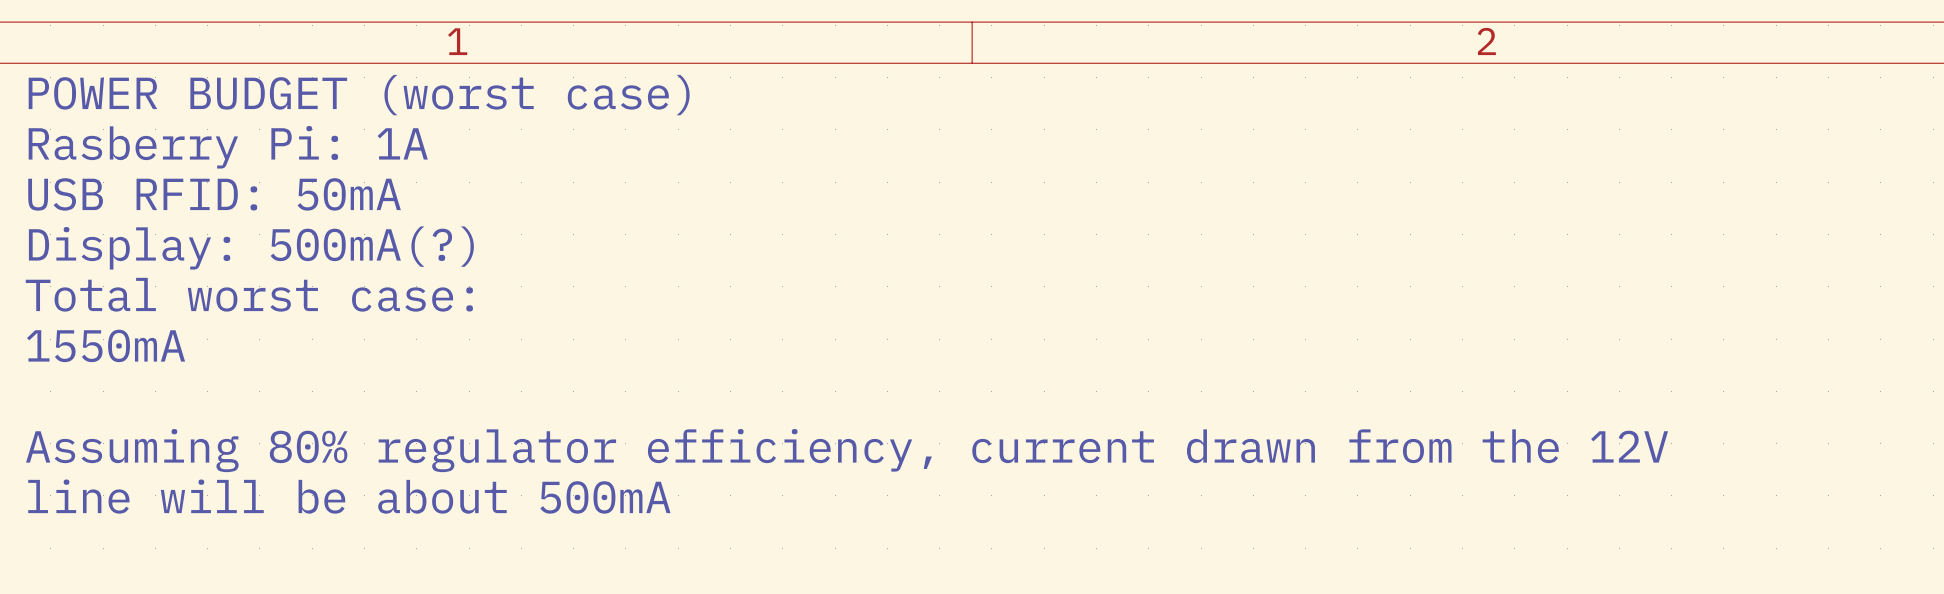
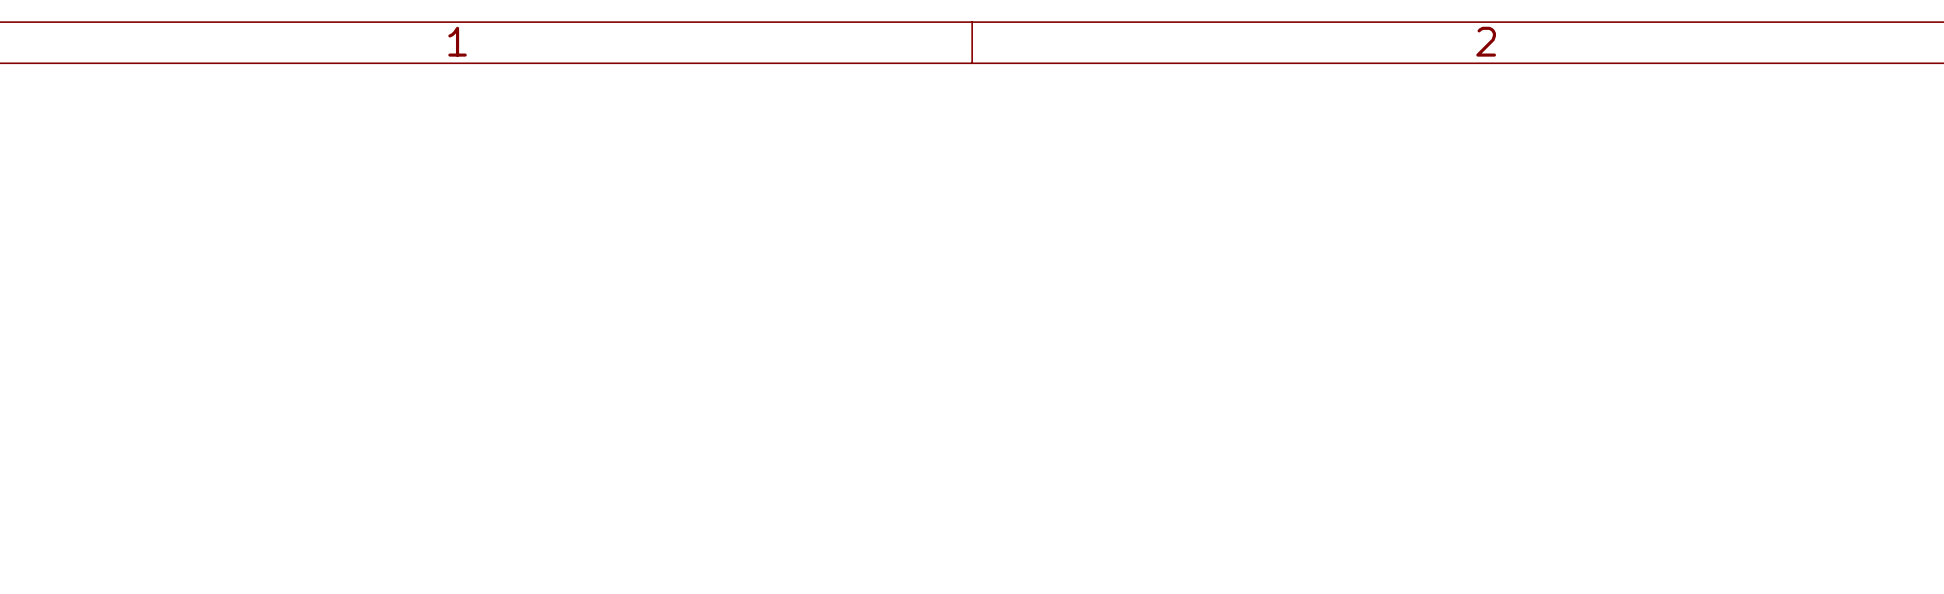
text: POWER BUDGET (worst case) (359, 95) -> none
text: Rasberry Pi: 1A (228, 147) -> none
text: USB RFID: 50mA (214, 194) -> none
text: Display: 500mA(?) (251, 248) -> none
text: Total worst case: (249, 294) -> none
text: 1550mA (106, 345) -> none
text: Assuming 80% regulator efficiency, current drawn from the 12V (847, 450) -> none
text: line will be about 500mA (349, 496) -> none

